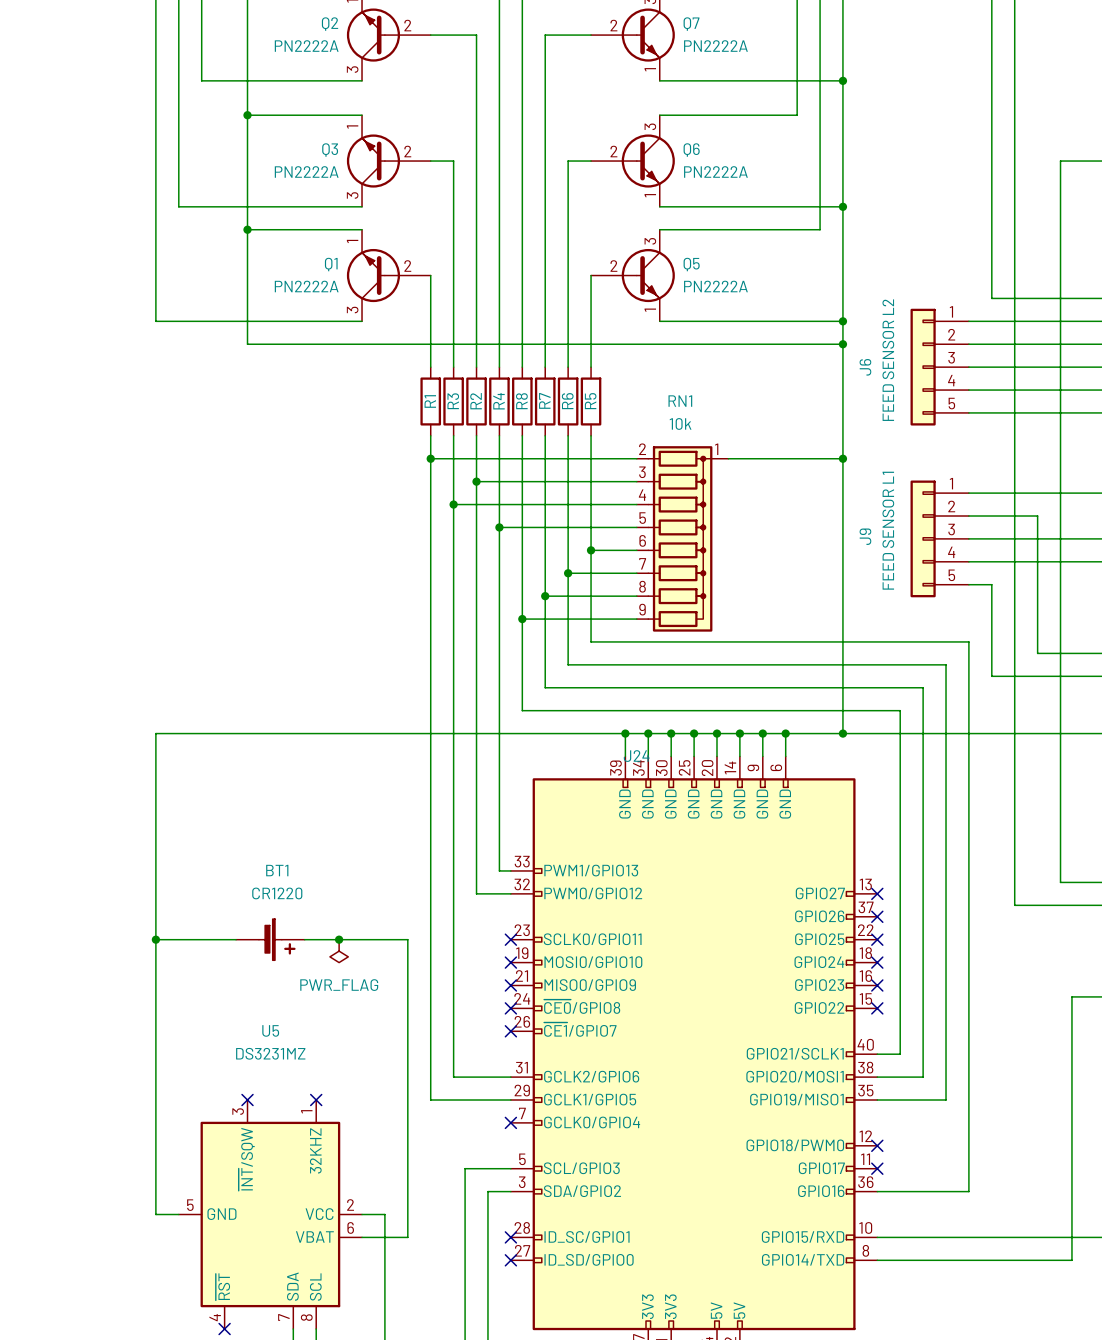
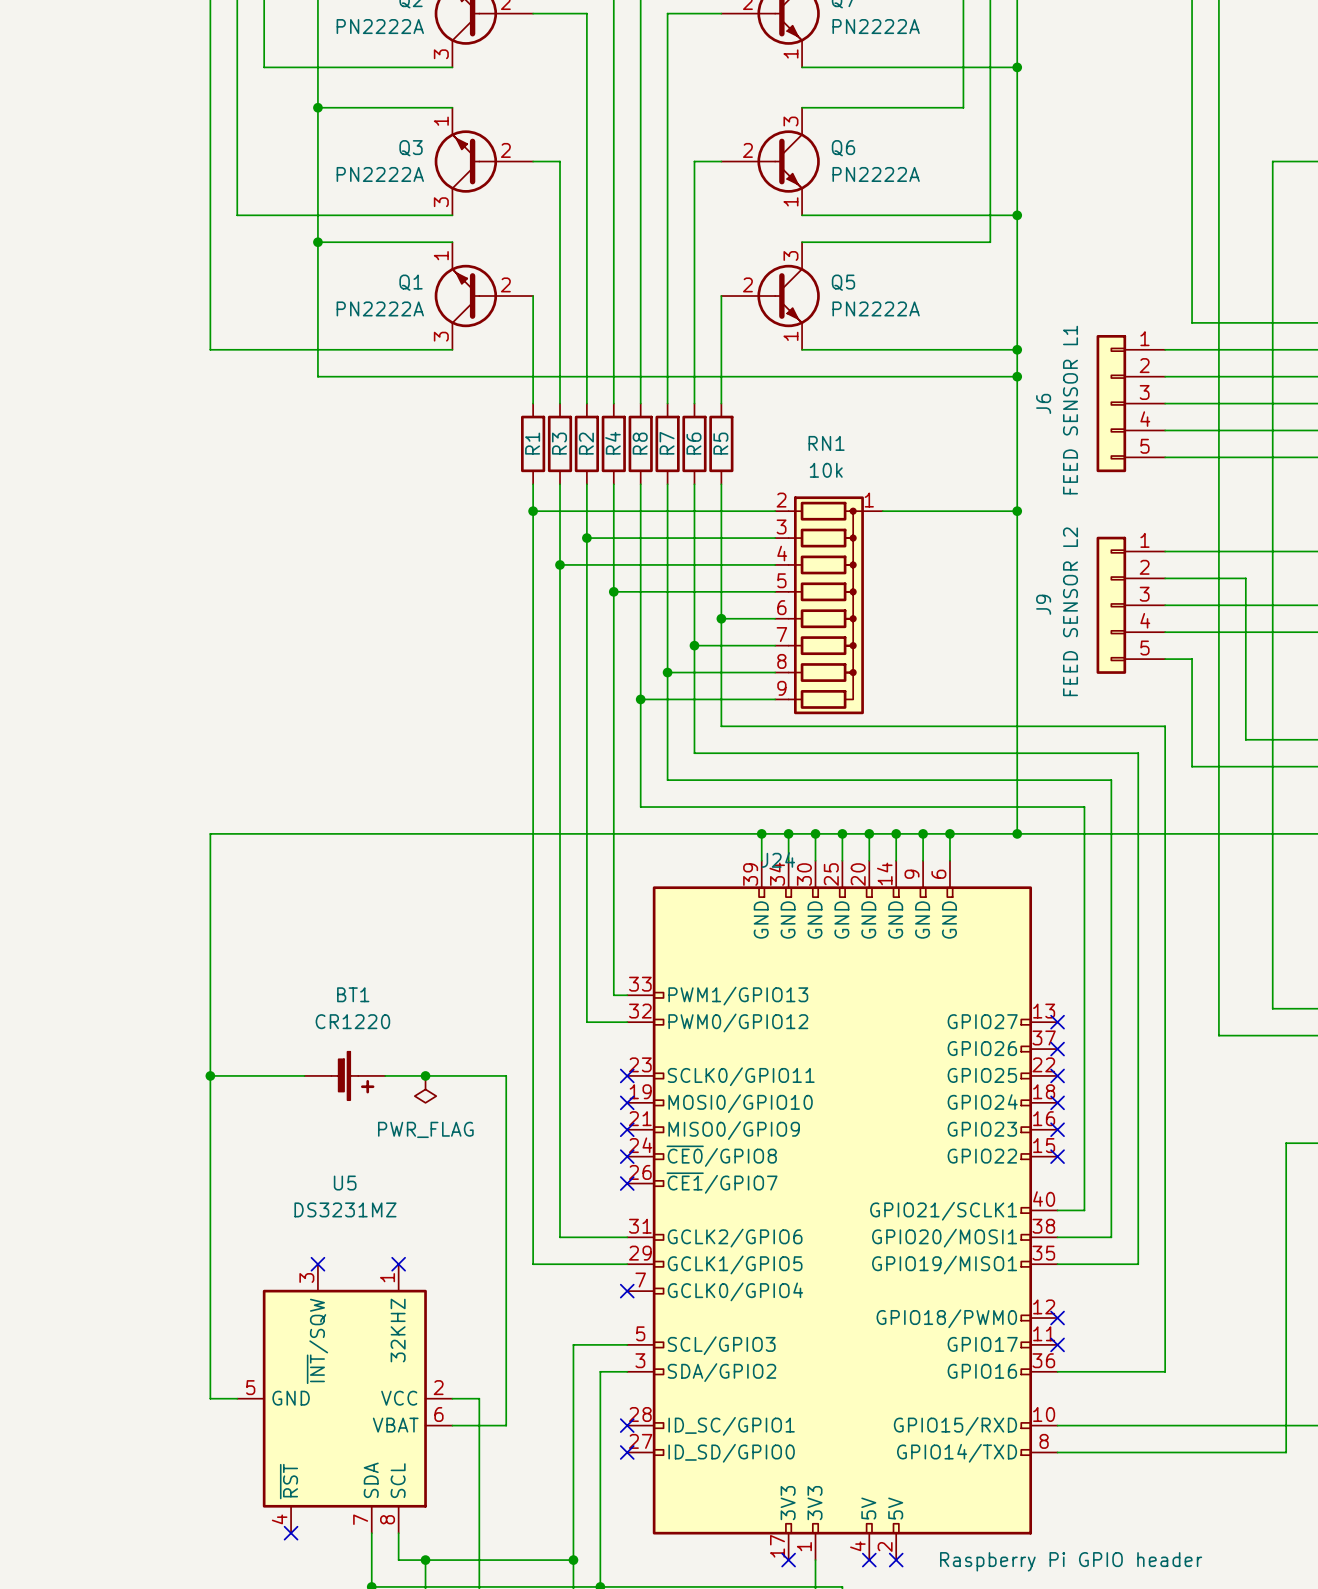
J6 value: FEED SENSOR L2 (888, 360) -> FEED SENSOR L1 (1070, 410)
J9 value: FEED SENSOR L1 (888, 530) -> FEED SENSOR L2 (1070, 611)

